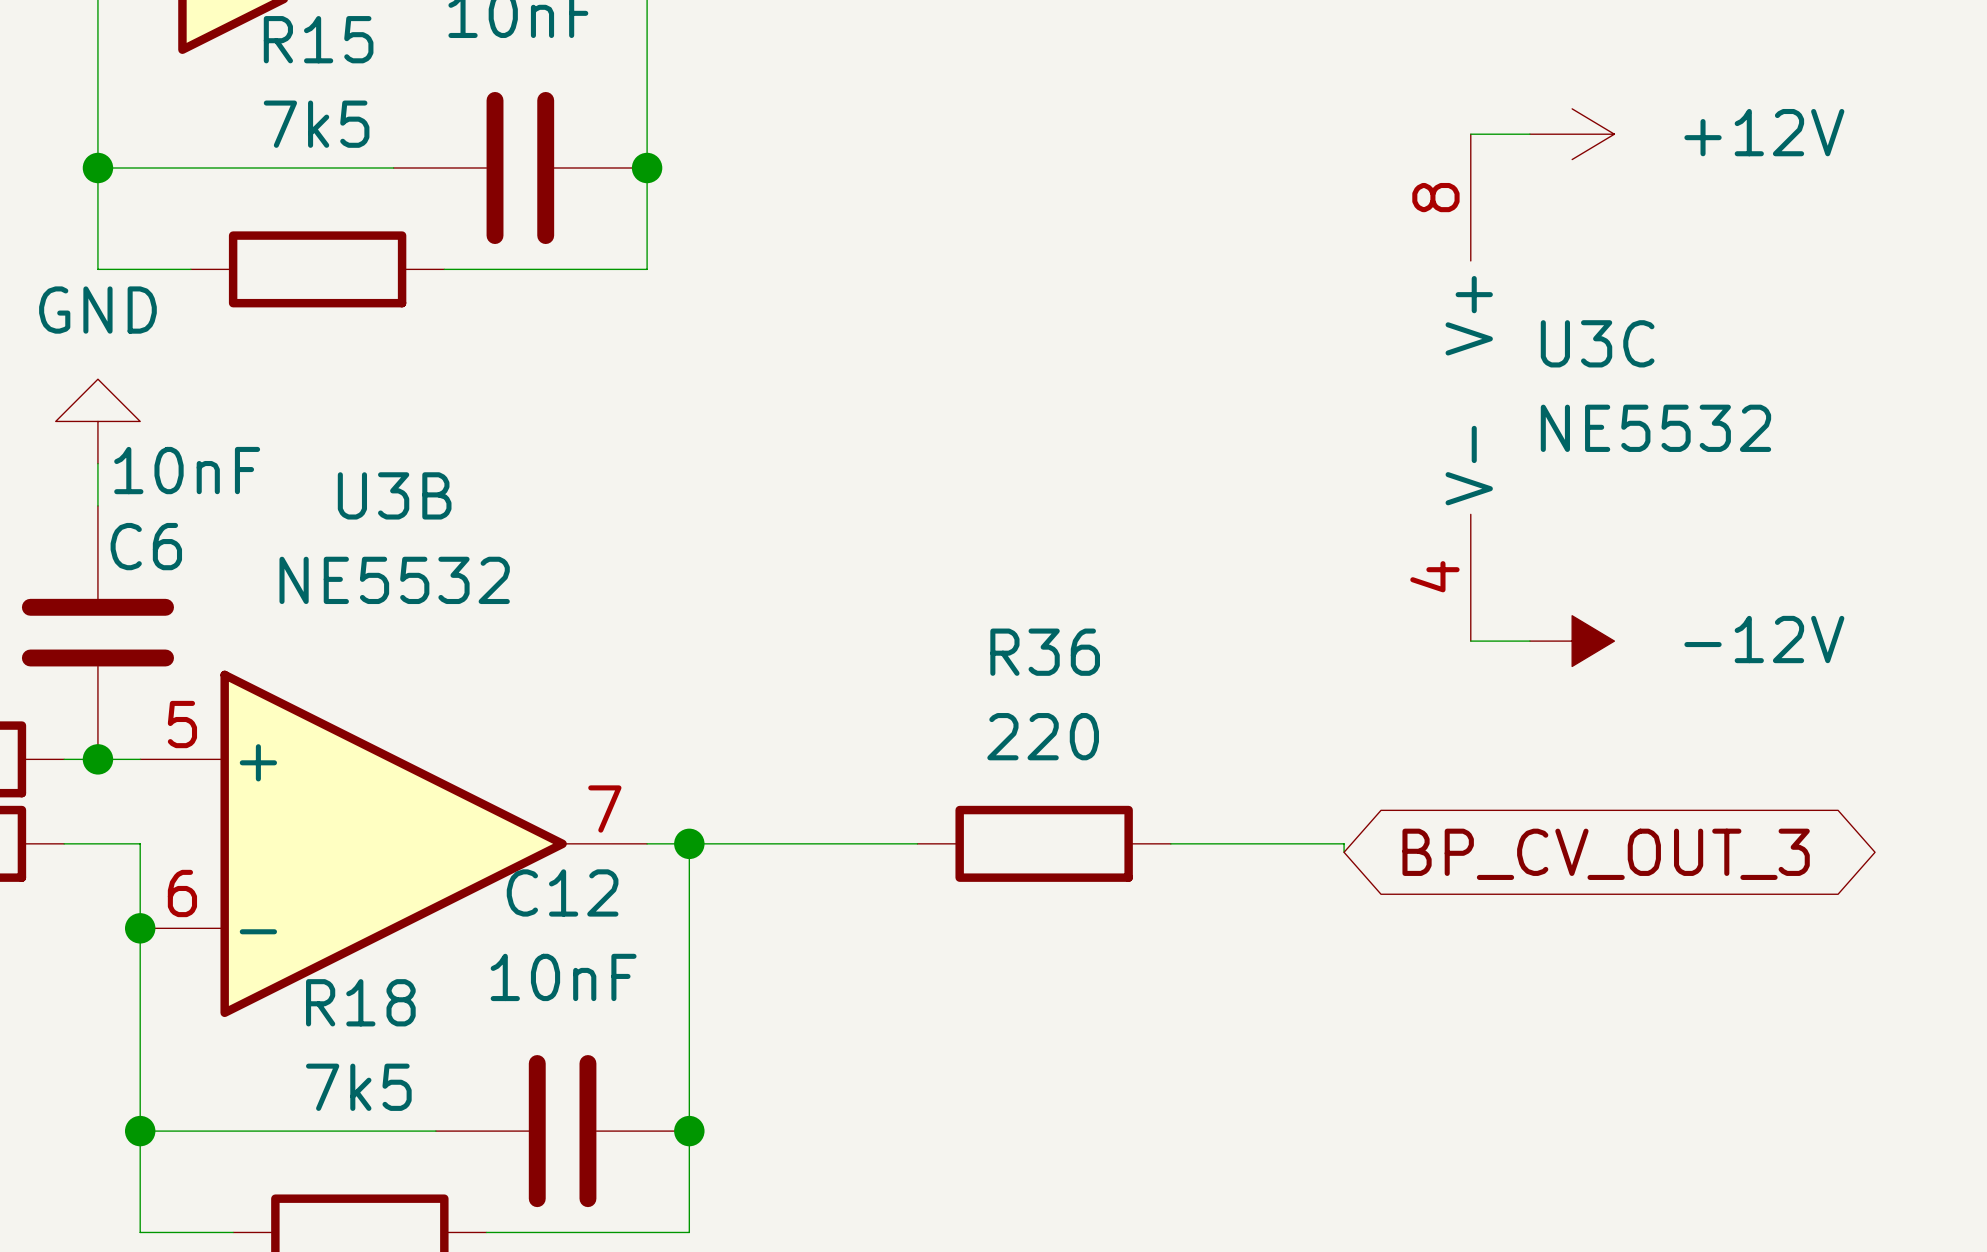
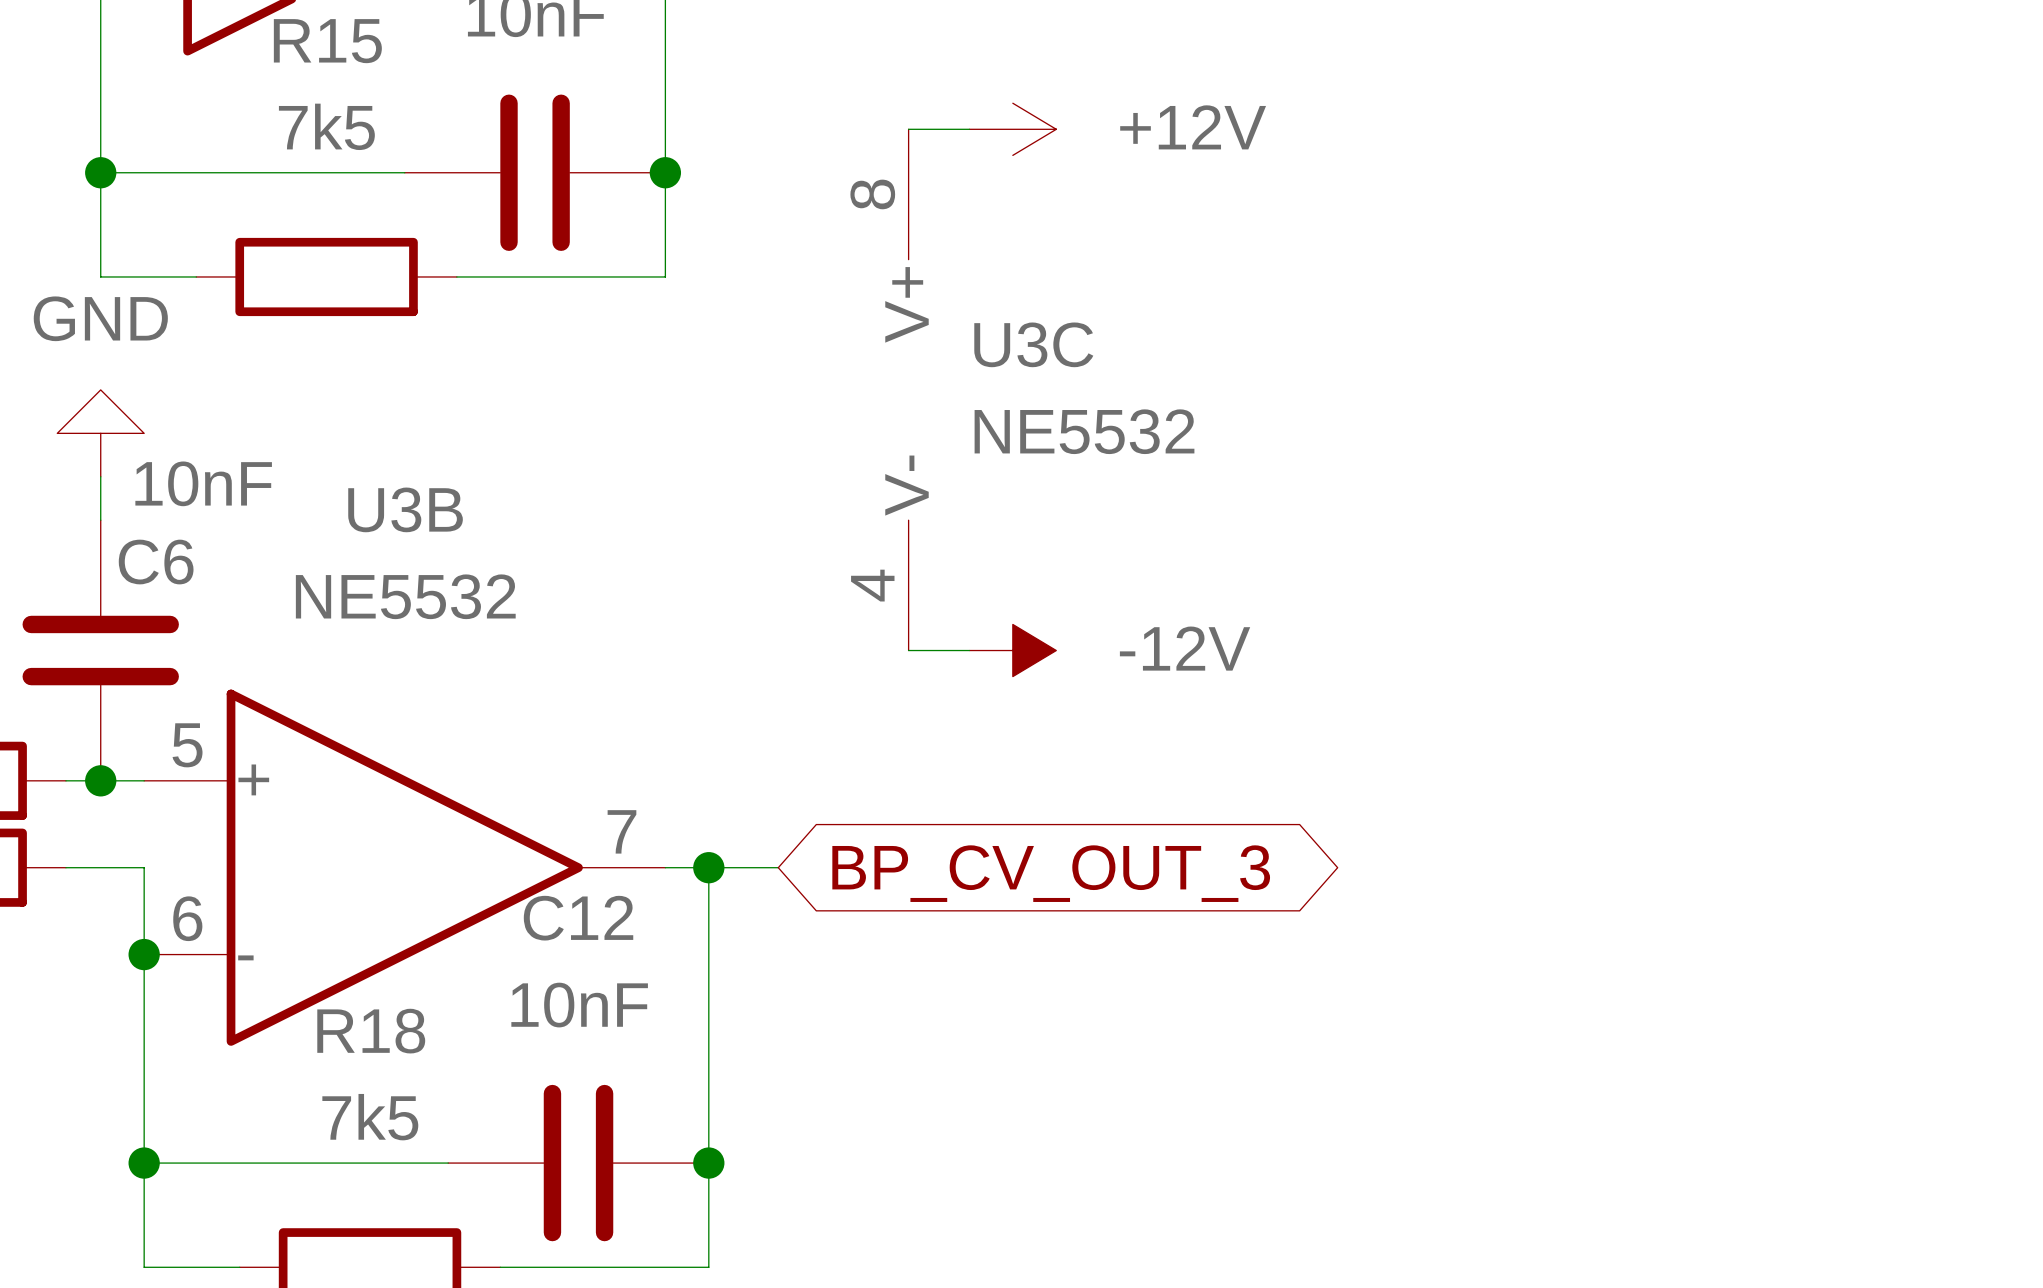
wire: (1470, 134) (1529, 134) -> (908, 129) (969, 129)
power symbol position: +12V (1572, 134) -> +12V (1012, 129)
U3C position: (1470, 387) -> (908, 389)
wire: (1470, 641) (1529, 641) -> (908, 650) (969, 650)
power symbol position: -12V (1572, 641) -> -12V (1012, 650)
wire: (756, 843) (917, 843) -> none
R36: 220 (1044, 843) -> none
wire: (1170, 843) (1344, 843) (1344, 852) -> none
global label position: BP_CV_OUT_3 (1606, 854) -> BP_CV_OUT_3 (1051, 873)

